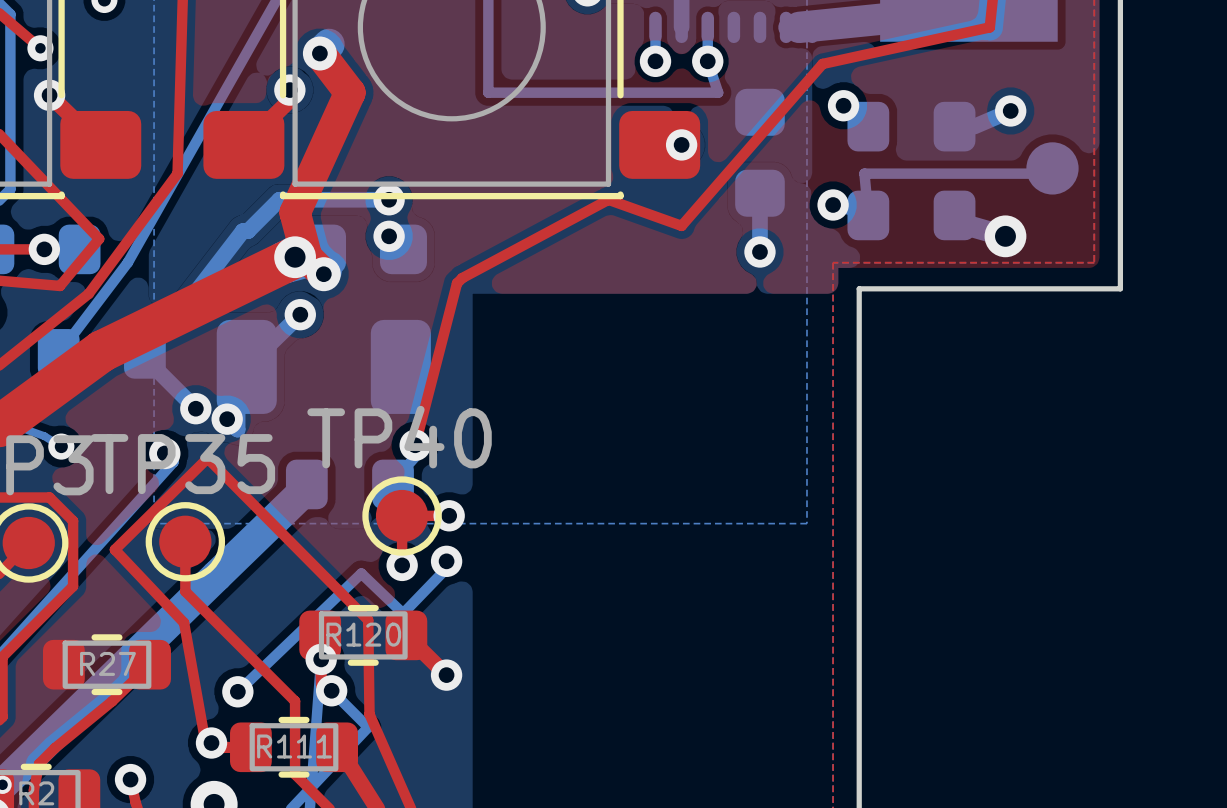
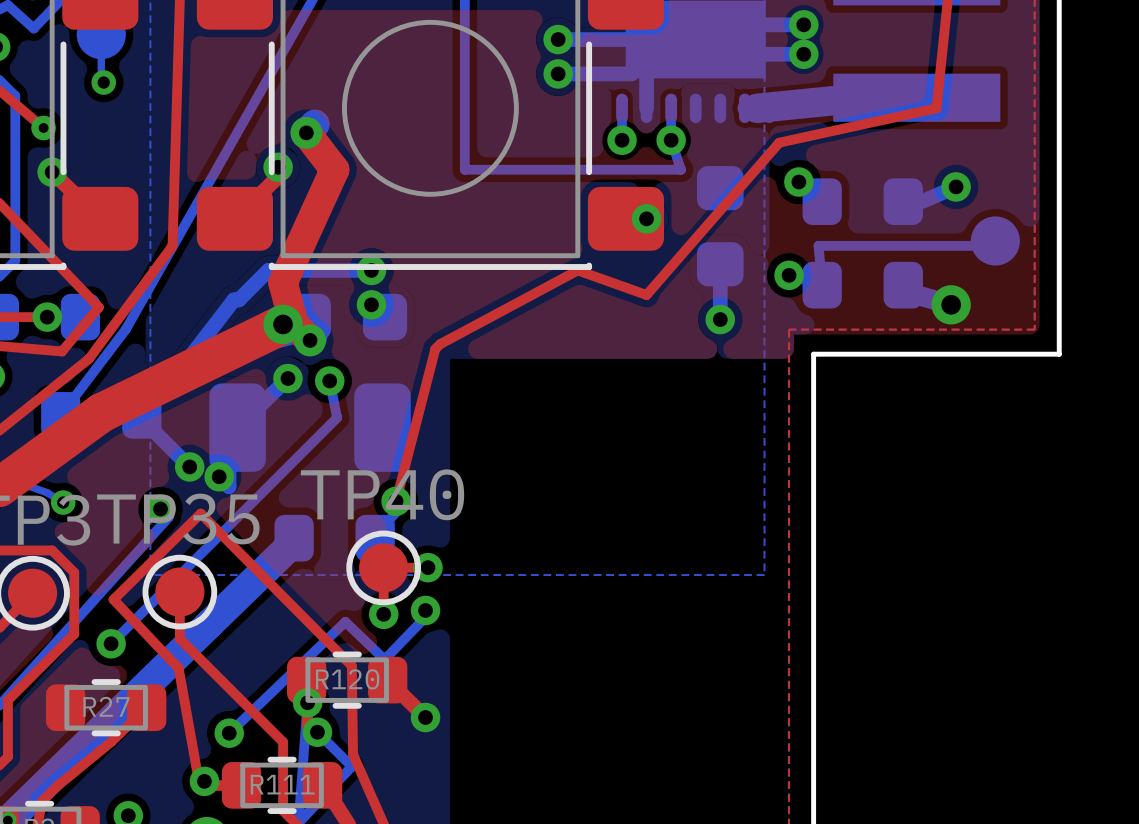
bottom track: none -> (329, 380) (337, 417) (111, 643)
via: none -> (329, 380)
via: none -> (111, 643)

